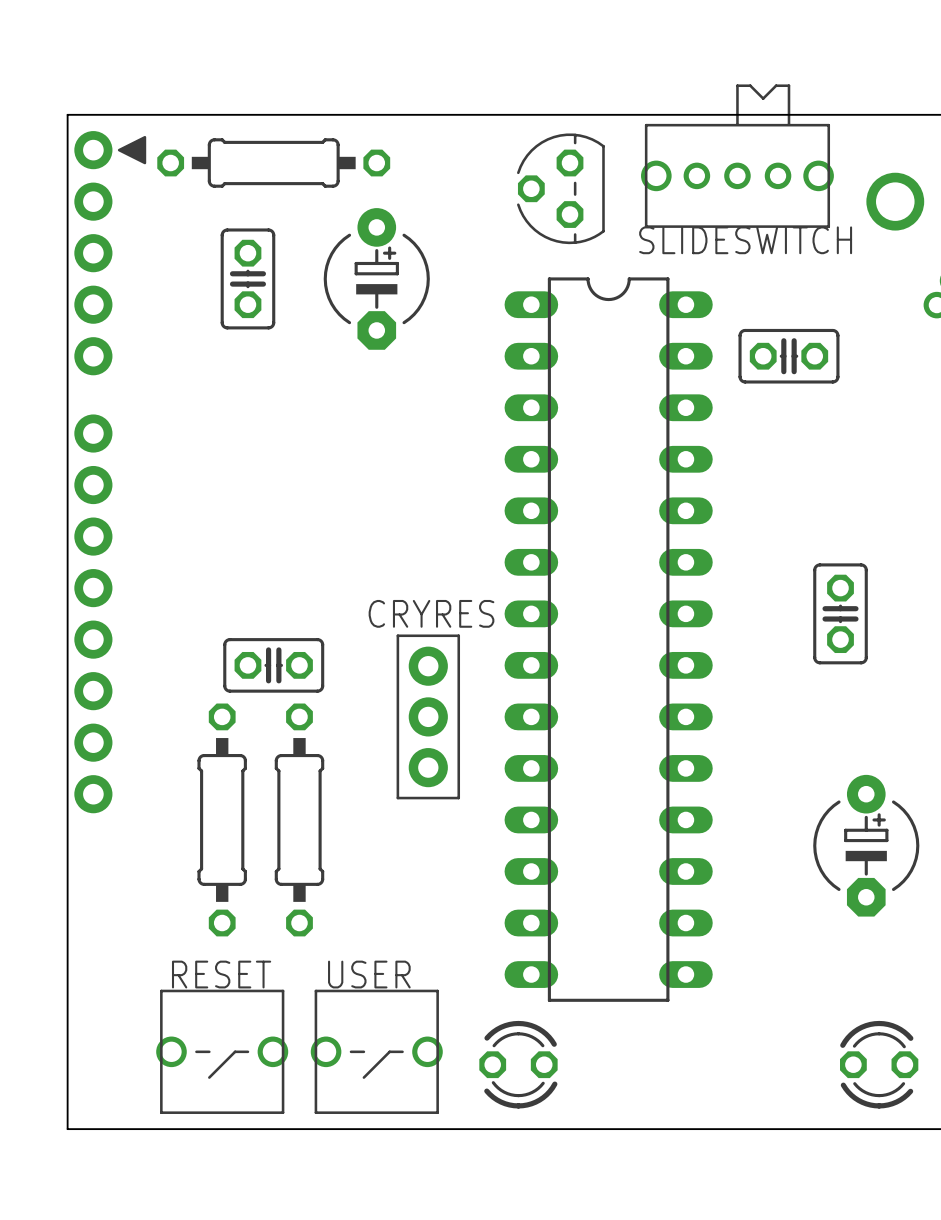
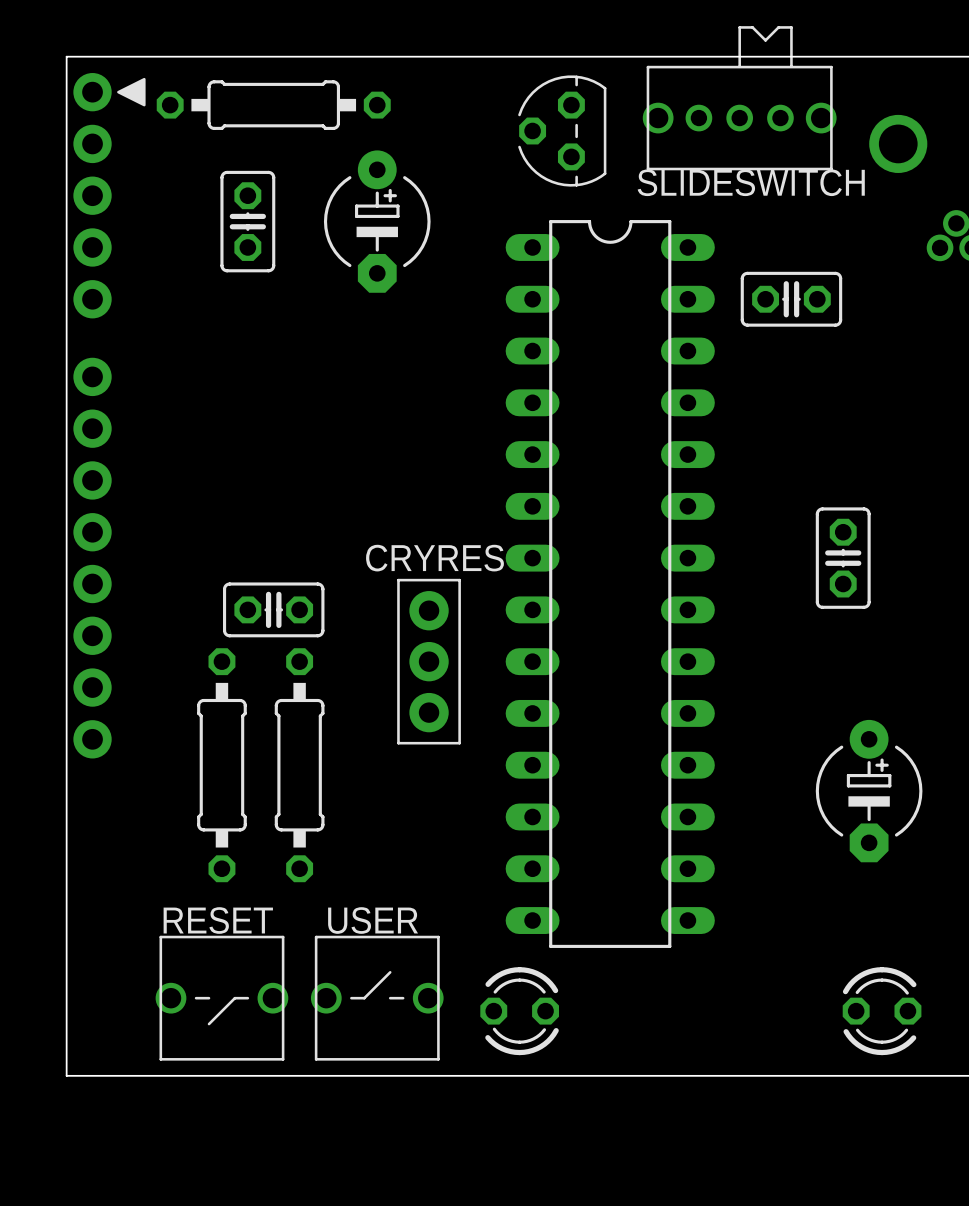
USER rotation: 0° (376, 1051) -> 180° (377, 998)

